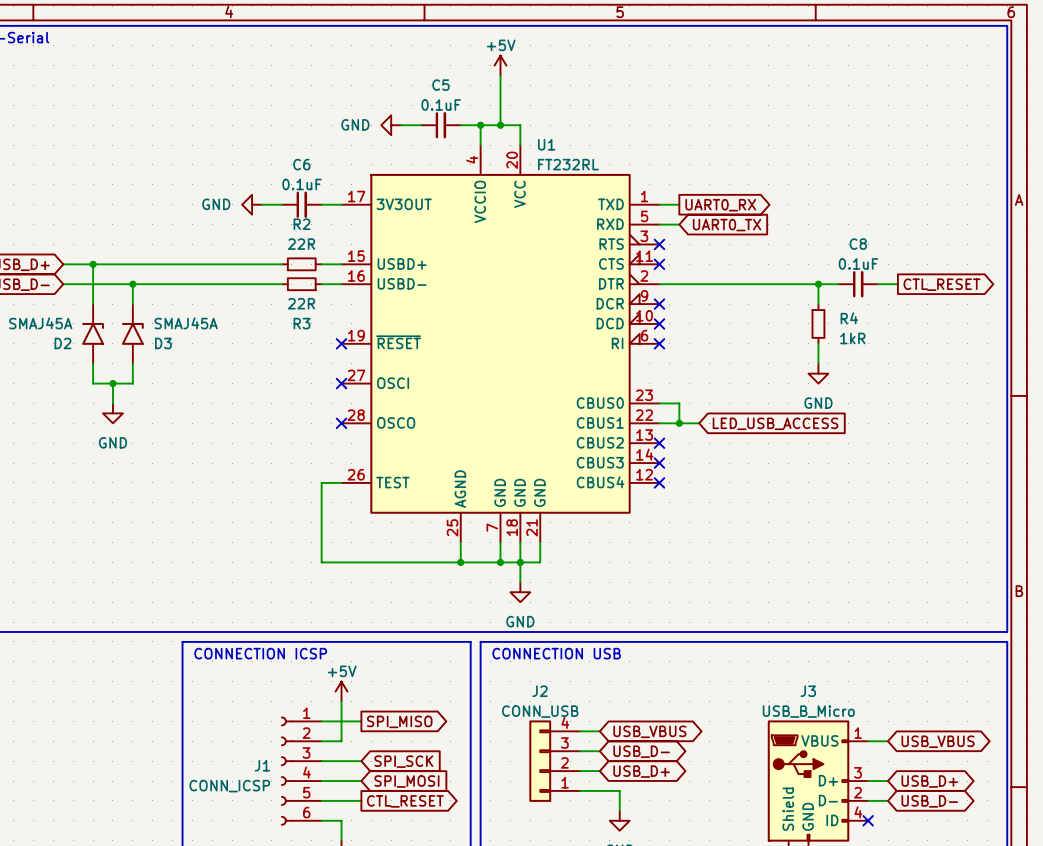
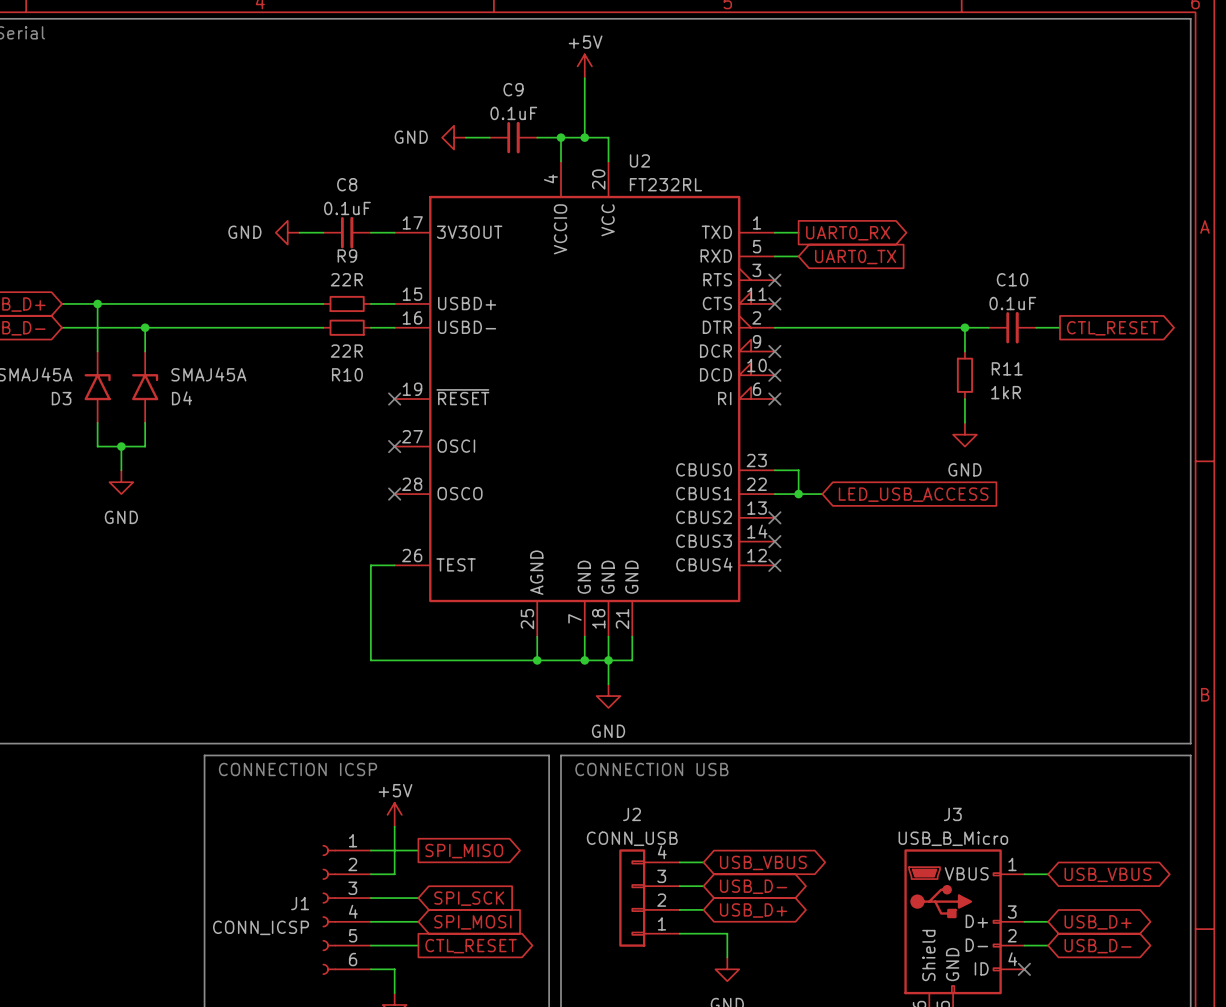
C5 name: C5 (440, 85) -> C9 (513, 89)
U1 name: U1 (546, 144) -> U2 (639, 160)
C6 name: C6 (301, 164) -> C8 (347, 184)
R2 name: R2 (302, 224) -> R9 (347, 256)
C8 name: C8 (858, 244) -> C10 (1012, 279)
R4 name: R4 (849, 318) -> R11 (1007, 368)
R3 name: R3 (302, 323) -> R10 (347, 374)
D2 name: D2 (62, 343) -> D3 (61, 398)
D3 name: D3 (163, 343) -> D4 (182, 398)

